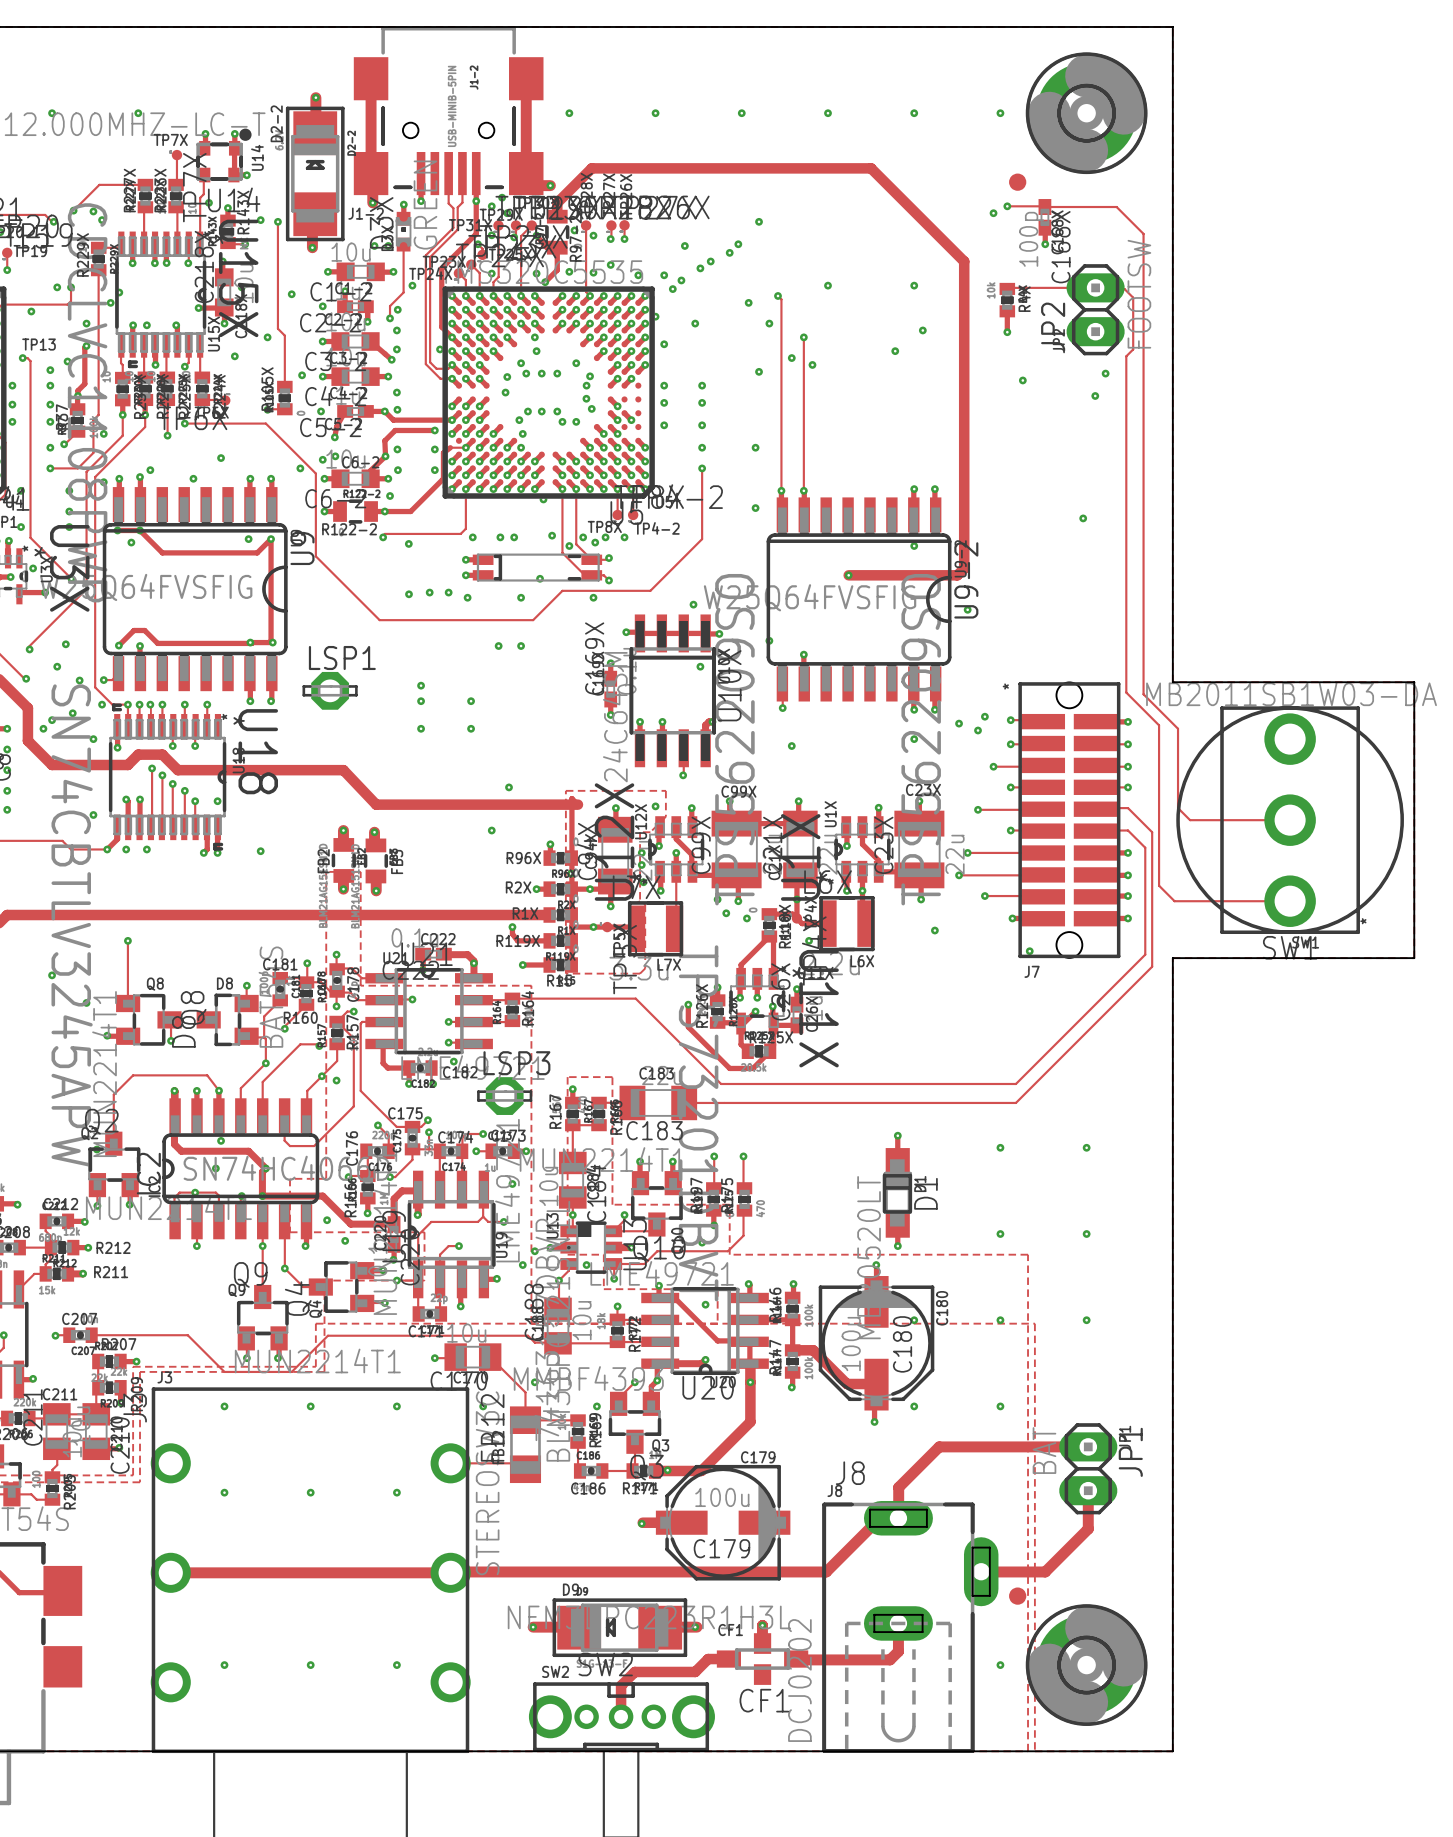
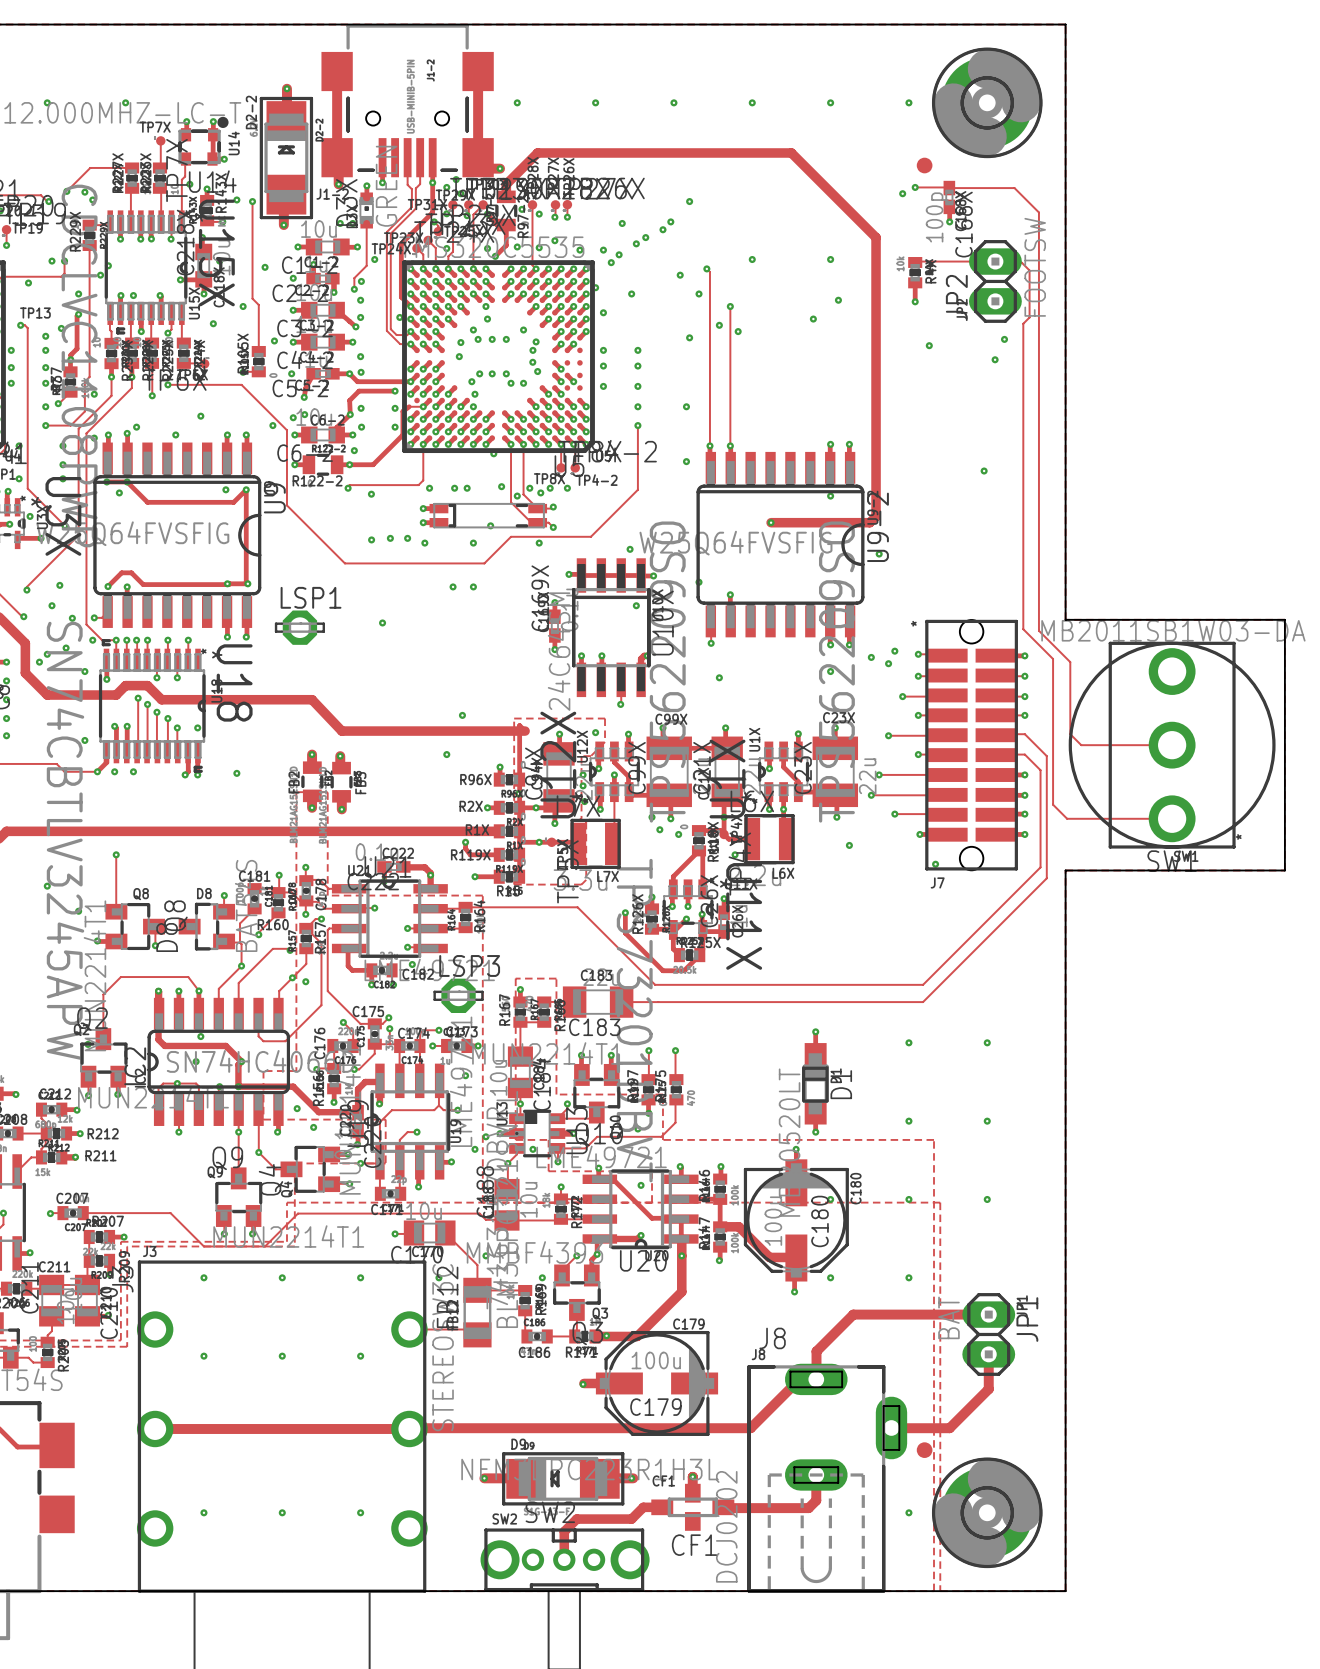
via: (421, 701) -> none
via: (471, 701) -> none
via: (421, 728) -> none
via: (471, 728) -> none

